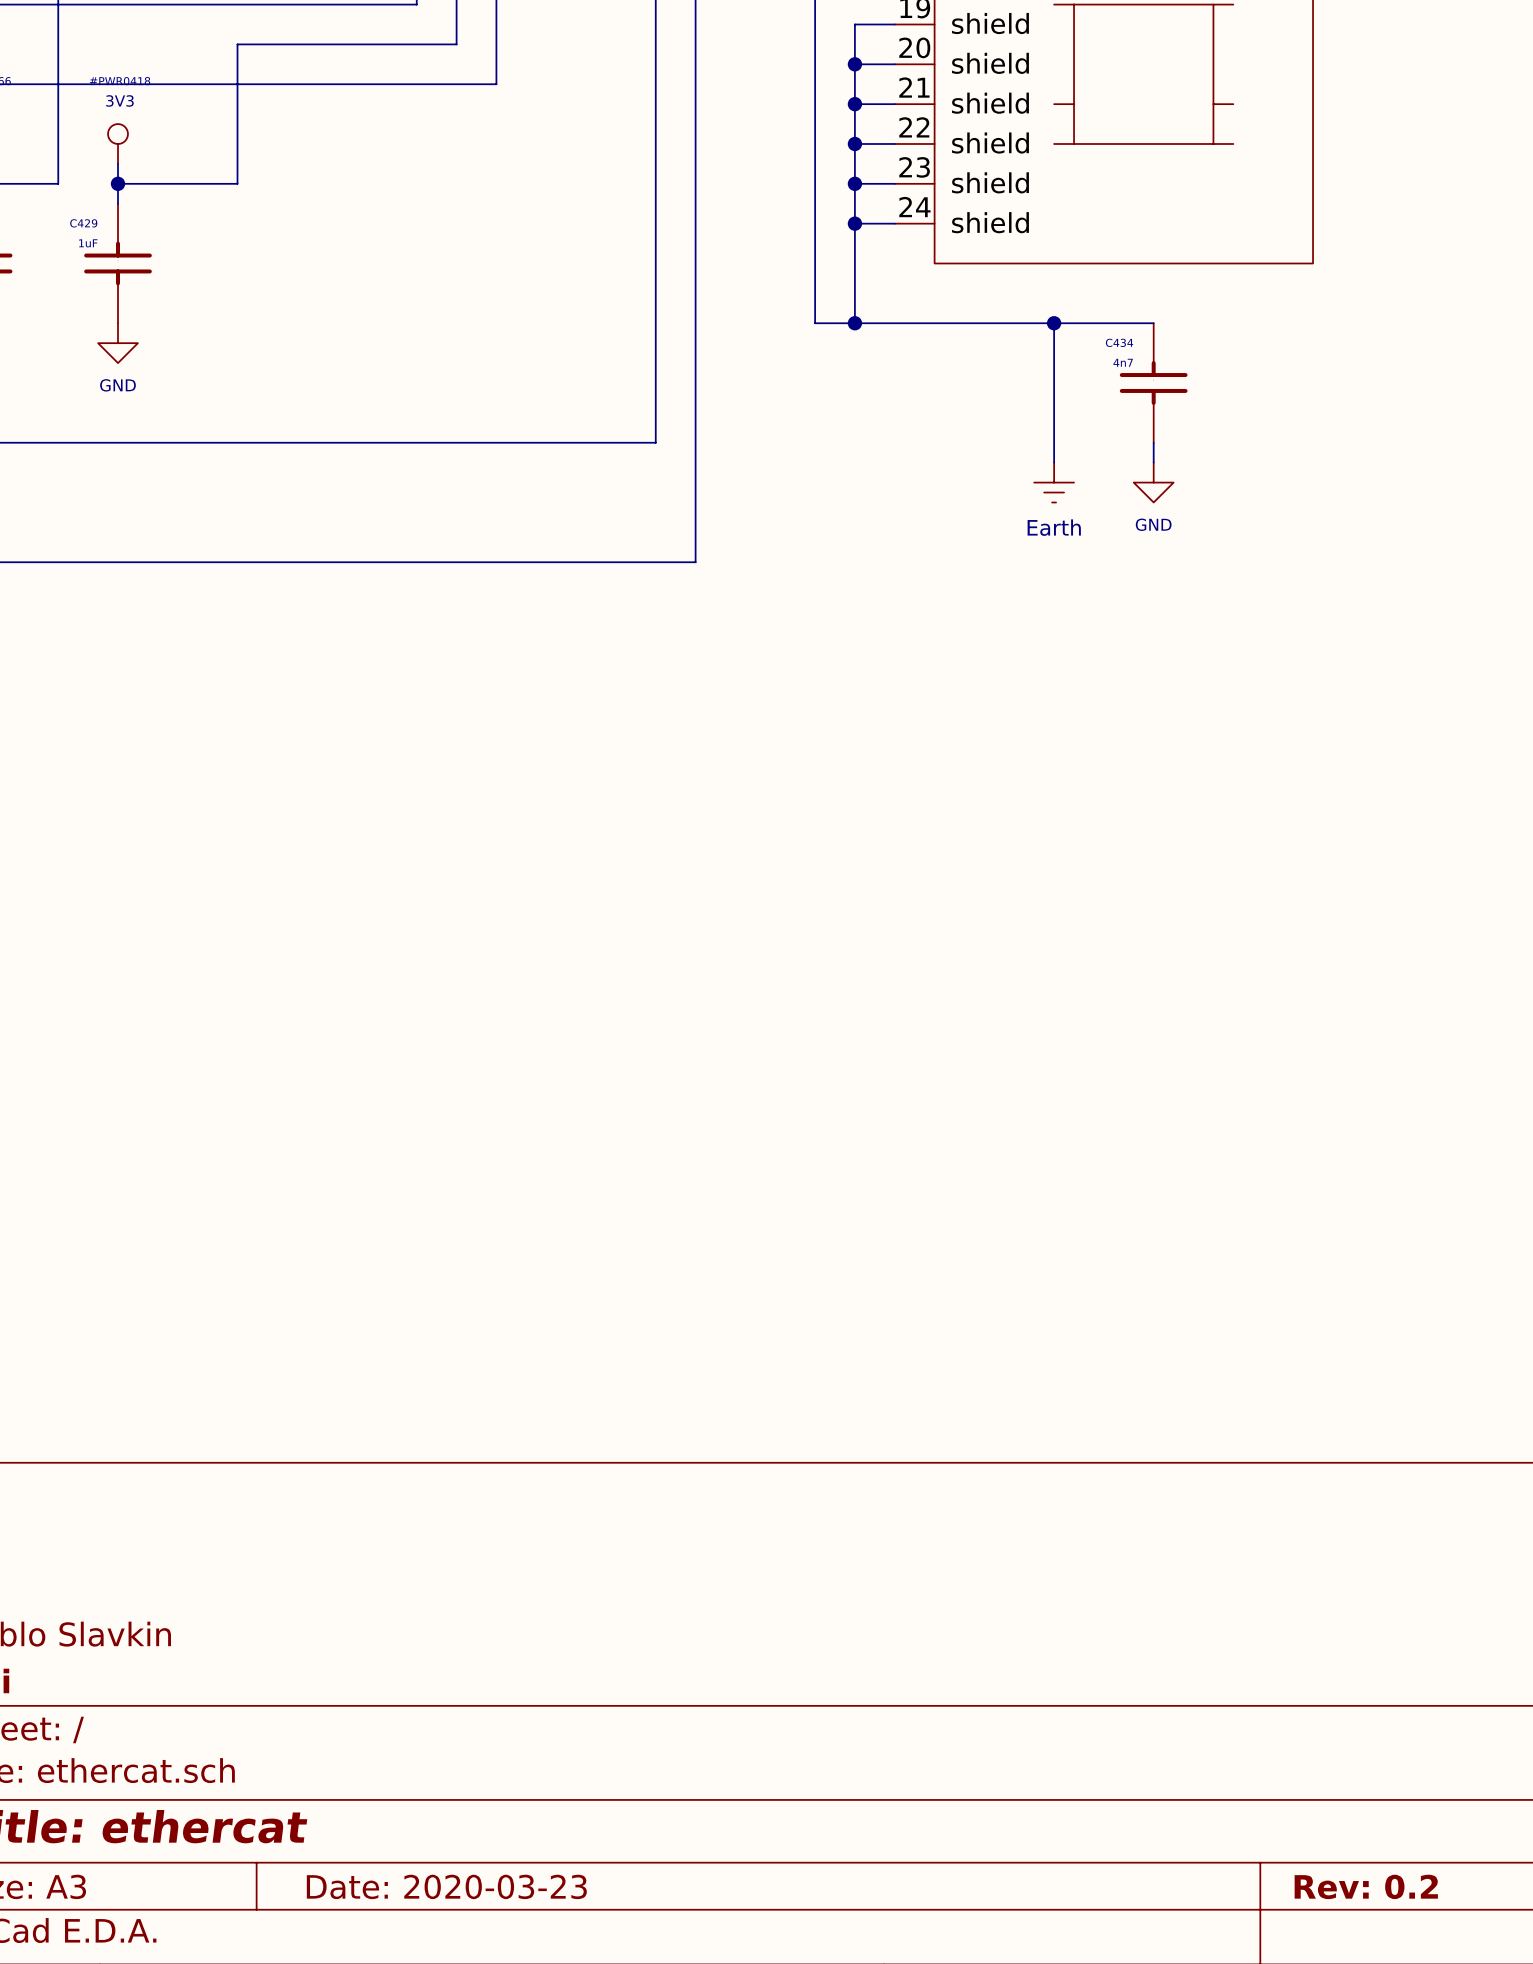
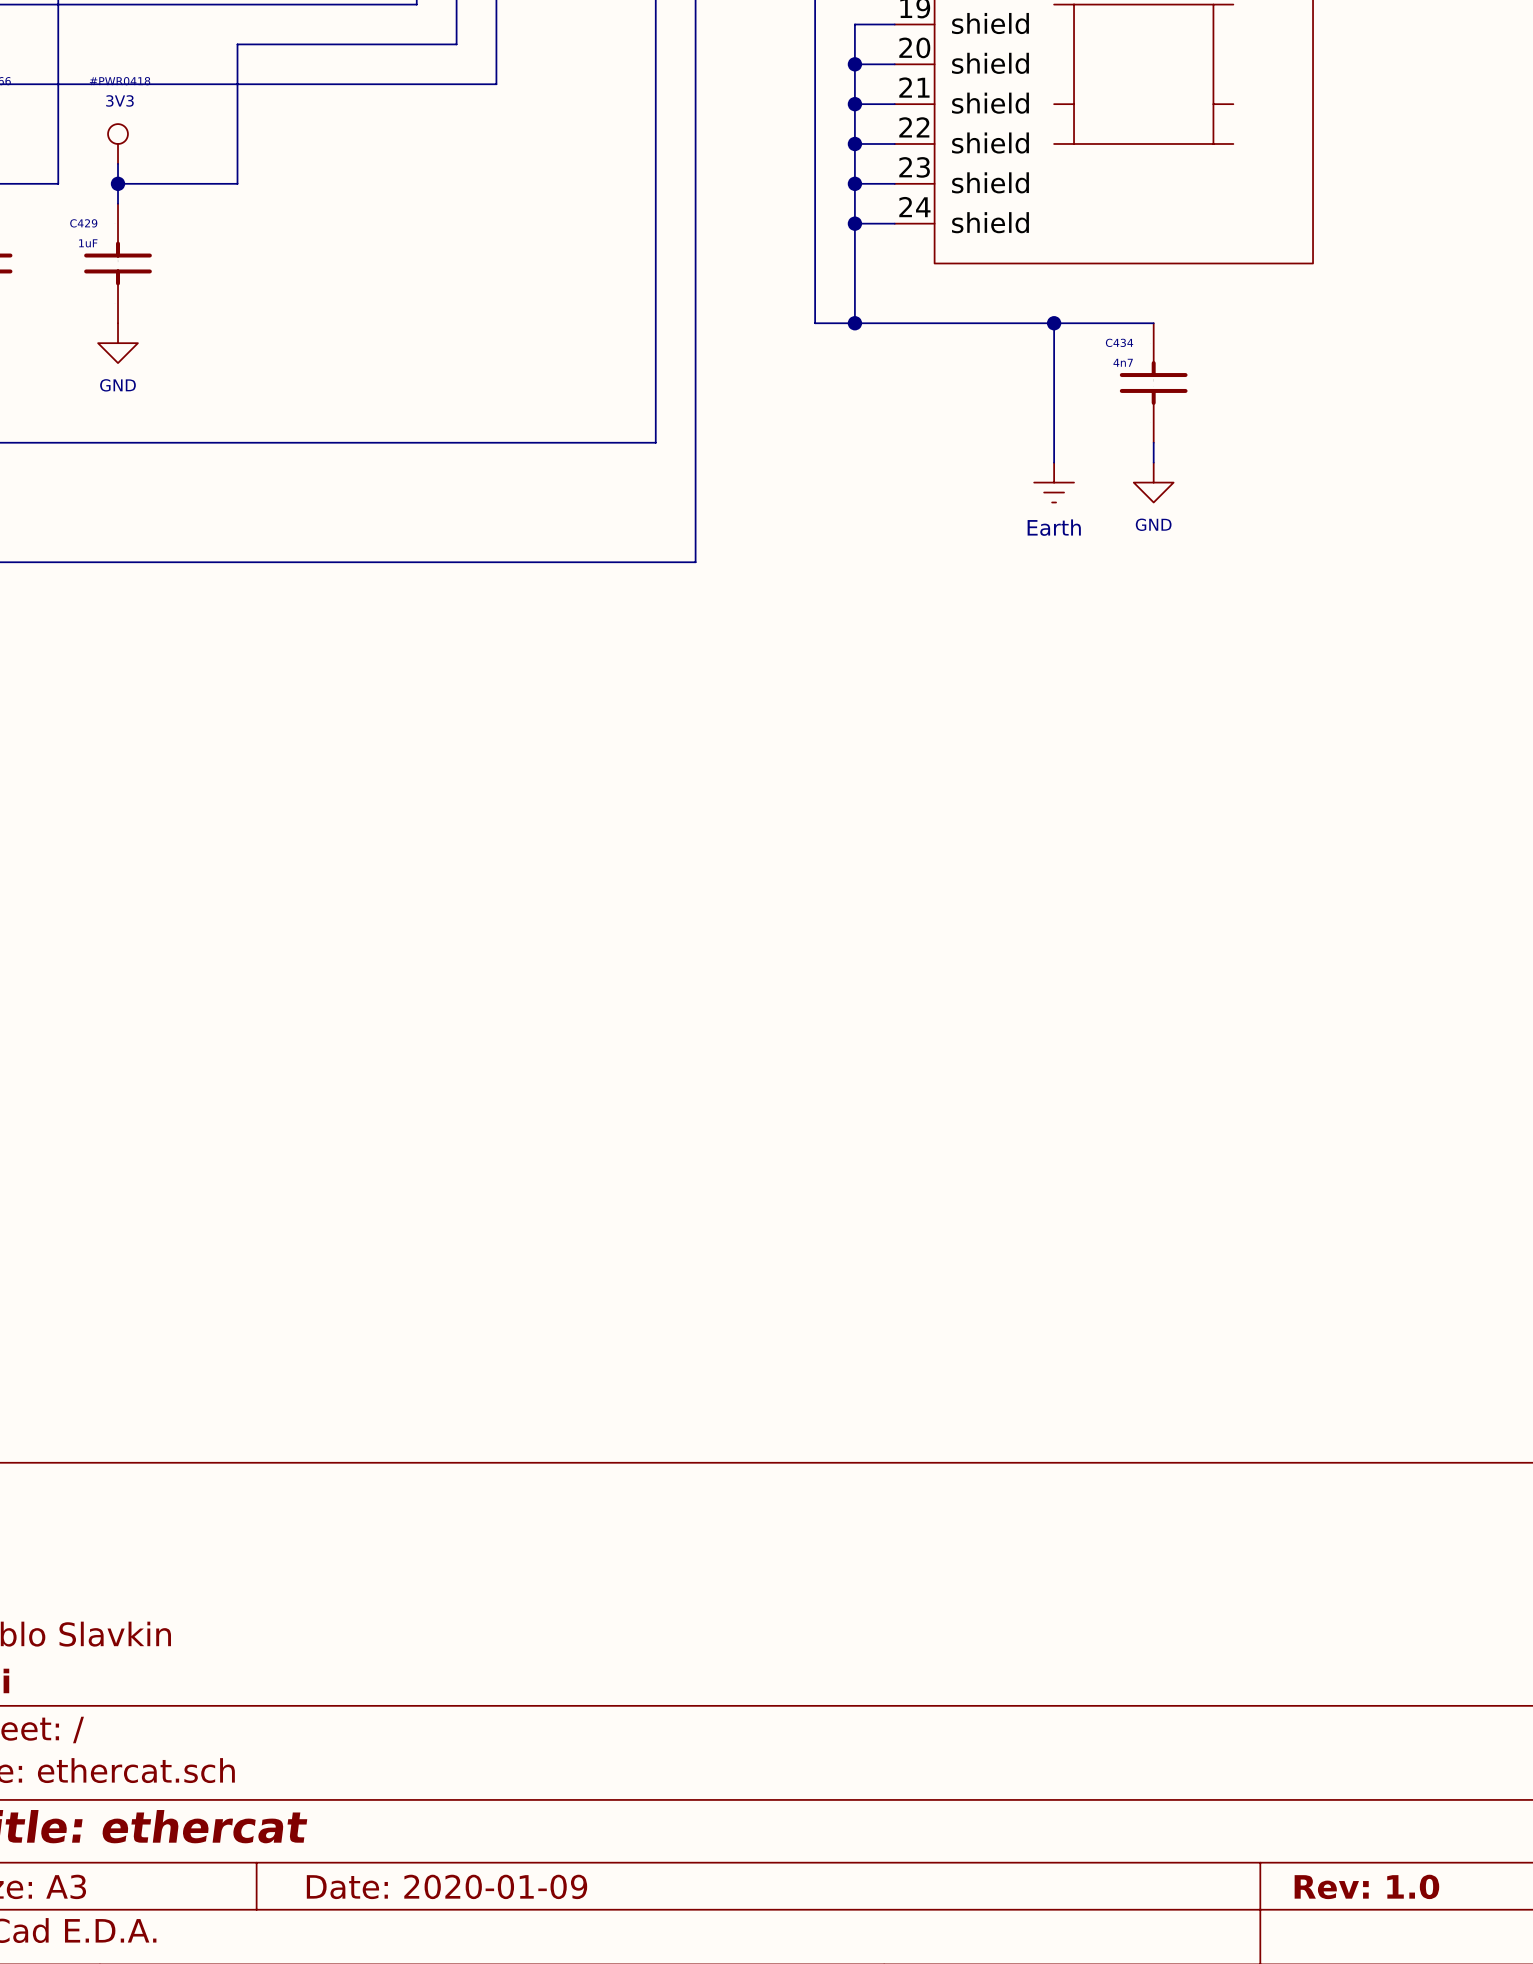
title block: Date: 2020-03-23 (446, 1886) -> Date: 2020-01-09 (447, 1886)
title block: Rev: 0.2 (1366, 1886) -> Rev: 1.0 (1366, 1886)

